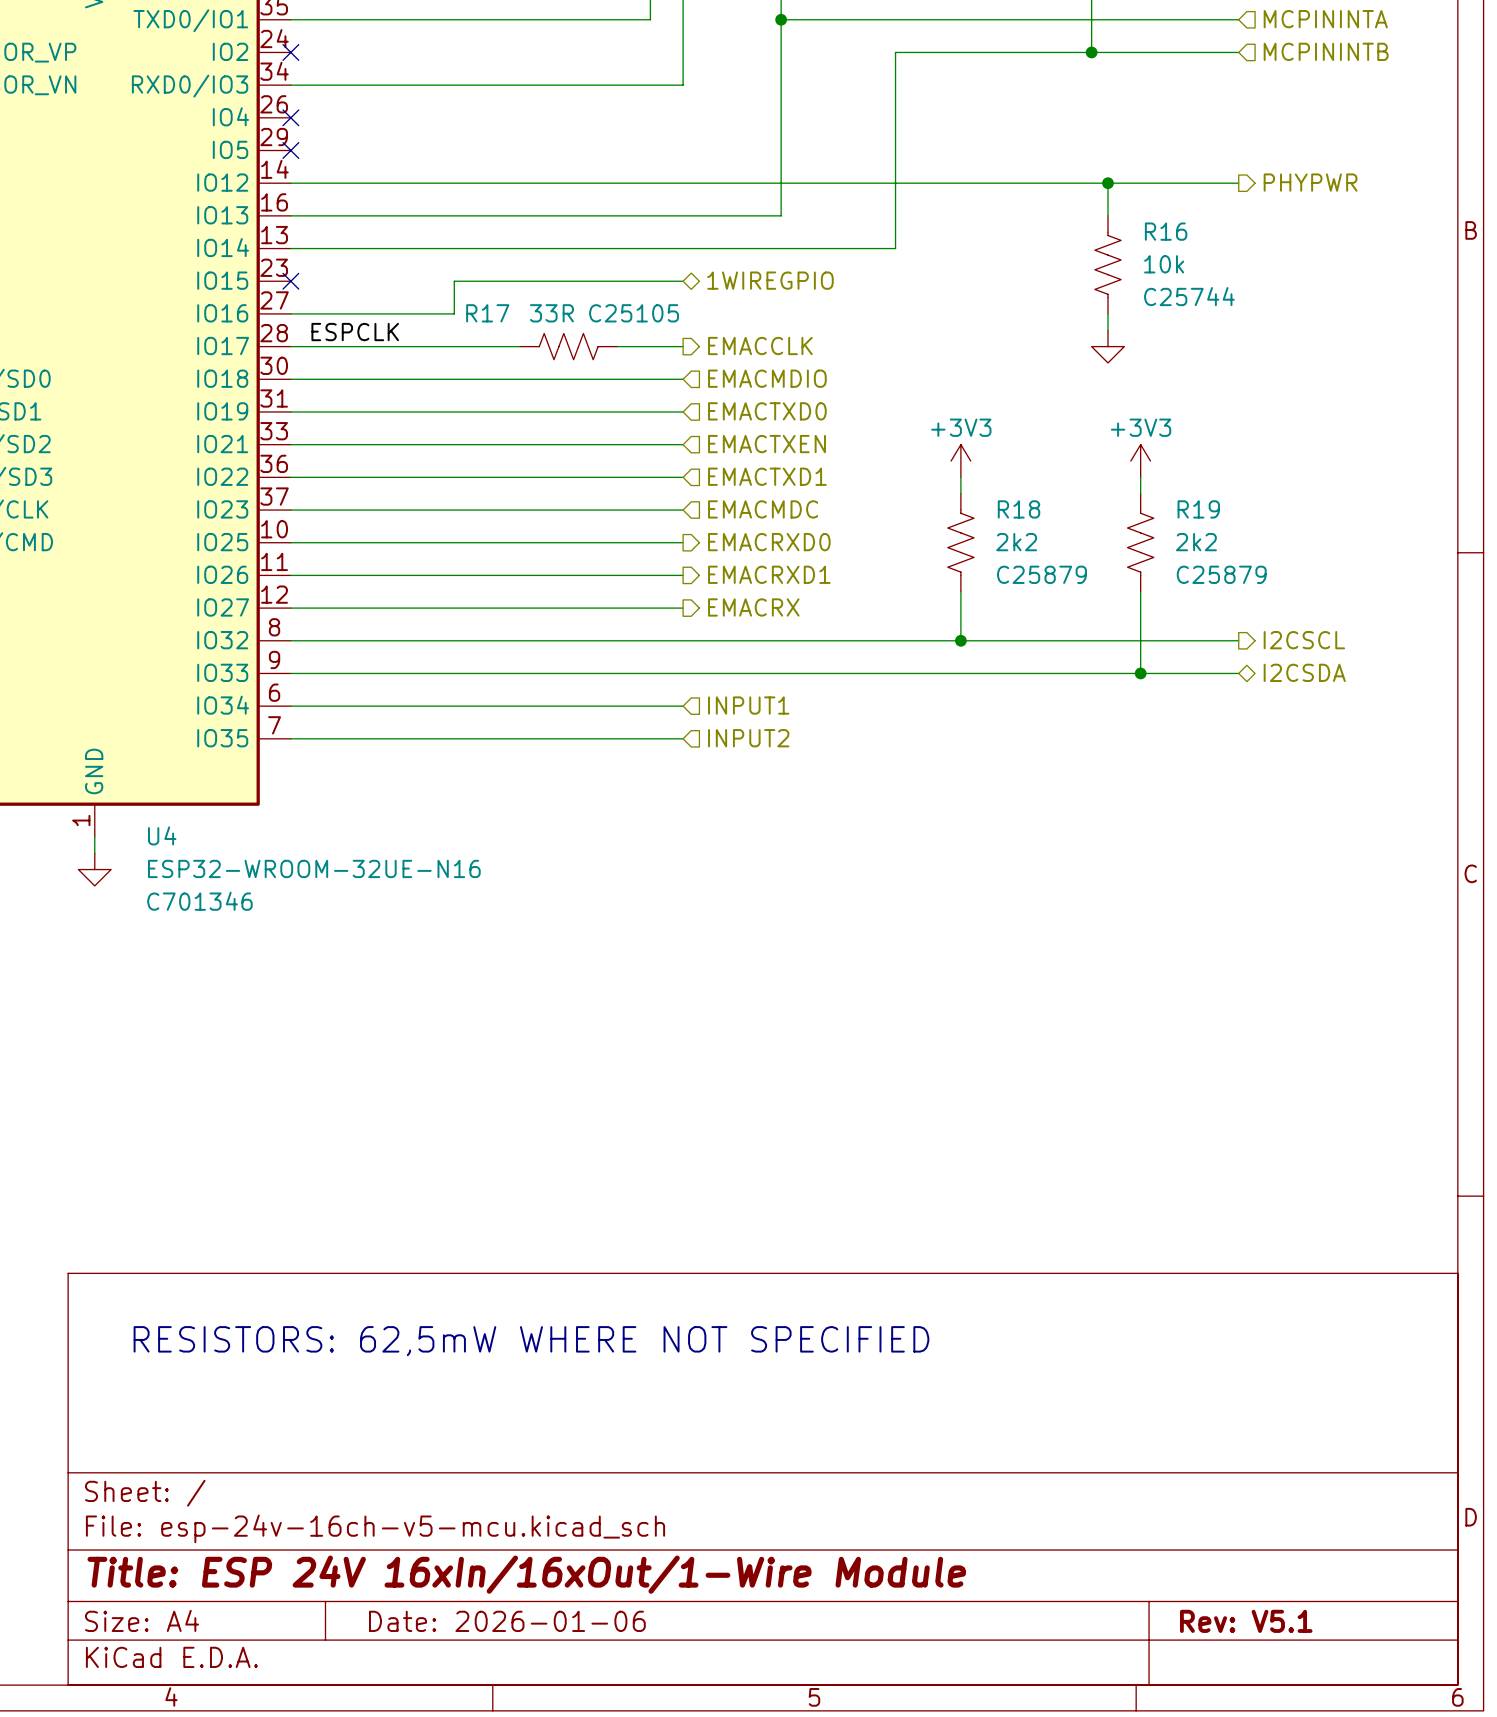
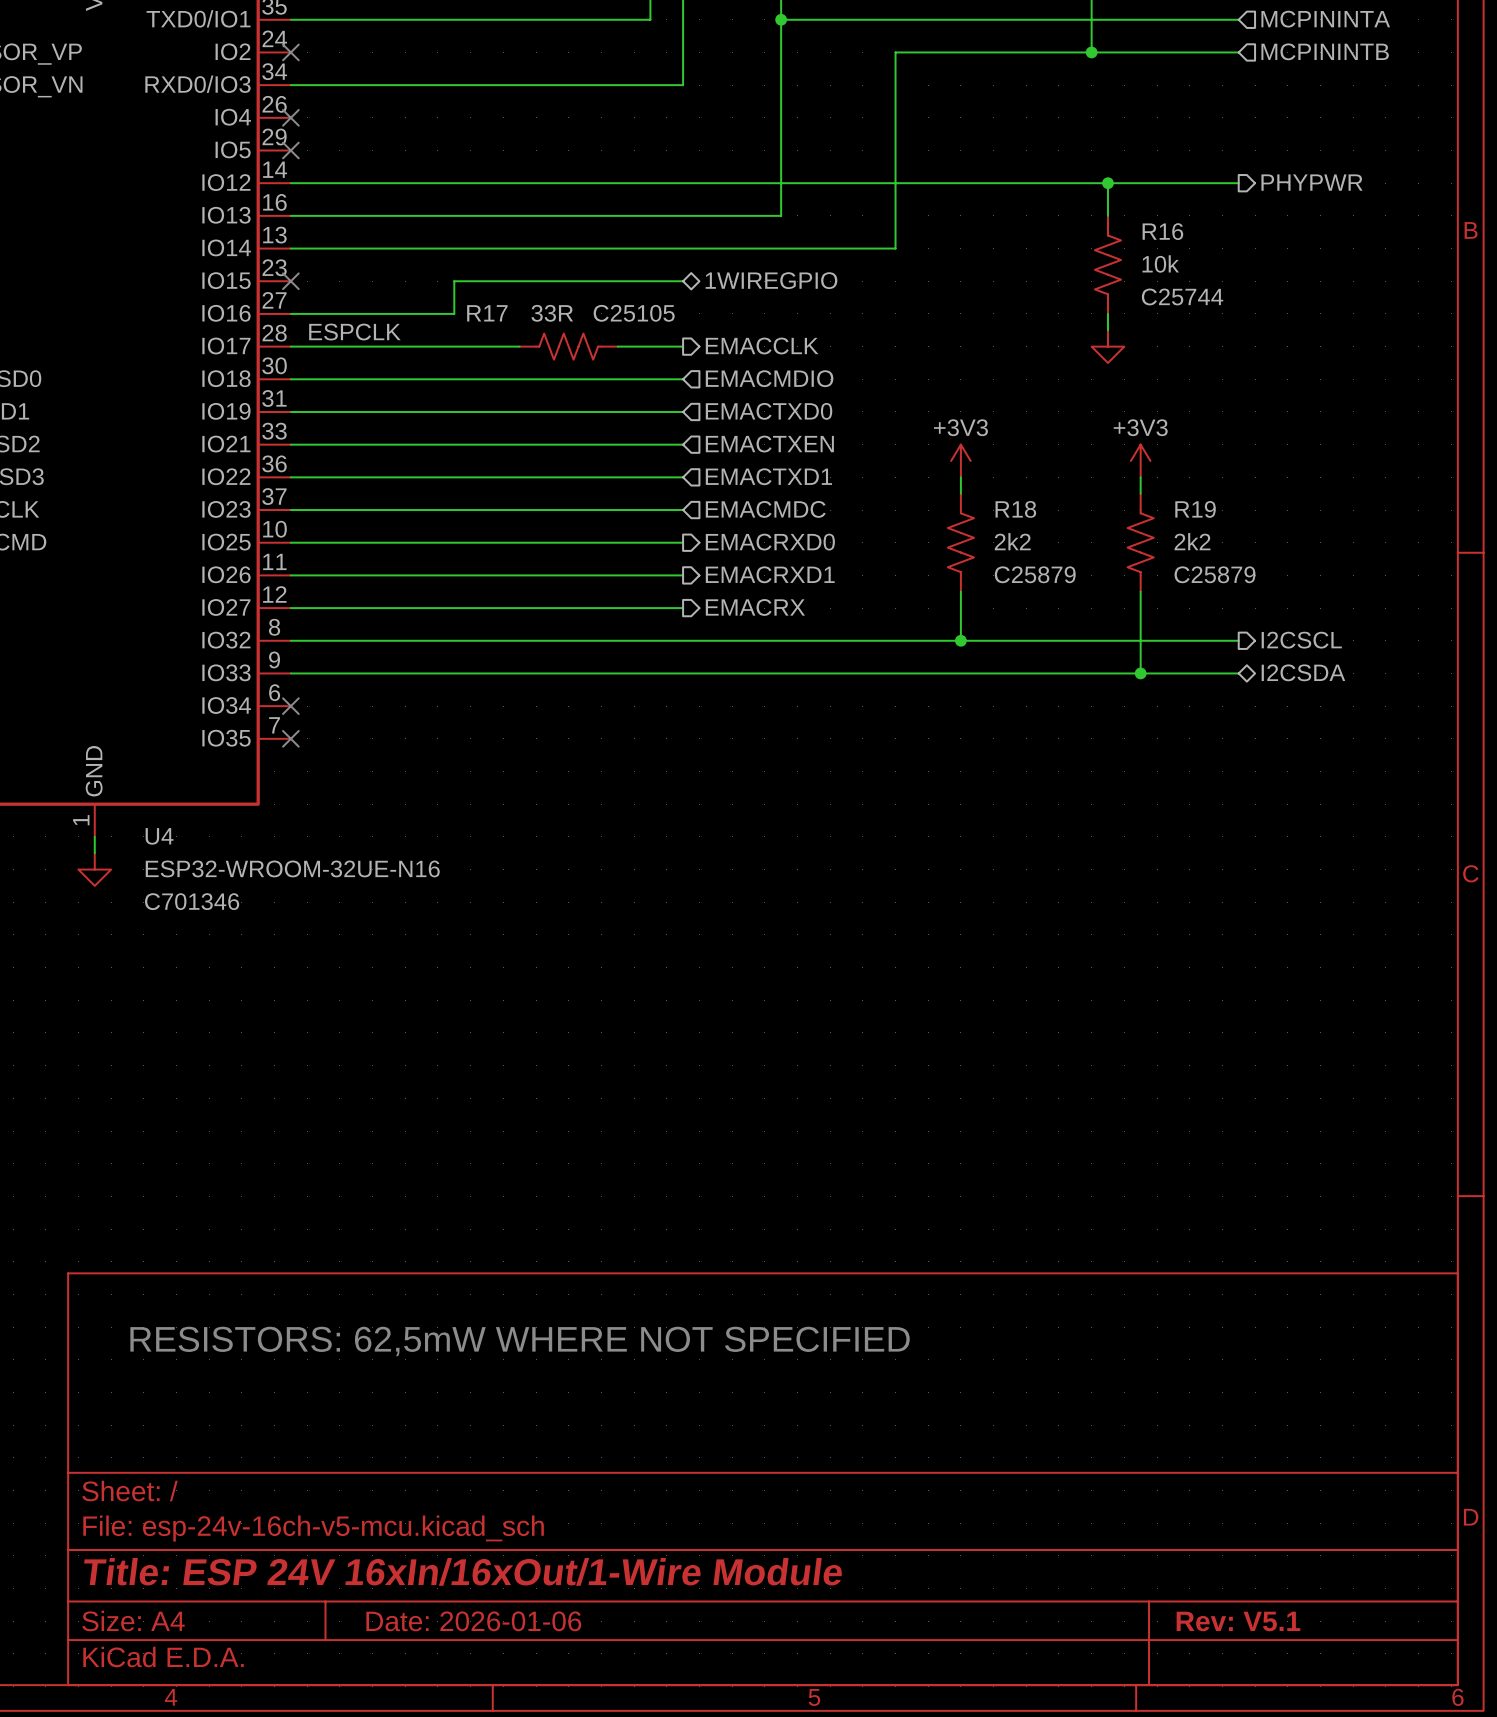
hierarchical label: INPUT1 (748, 705) -> none
wire: (290, 706) (683, 706) -> none
no-connect mark: none -> (290, 706)
wire: (290, 738) (683, 738) -> none
no-connect mark: none -> (290, 738)
hierarchical label: INPUT2 (748, 738) -> none

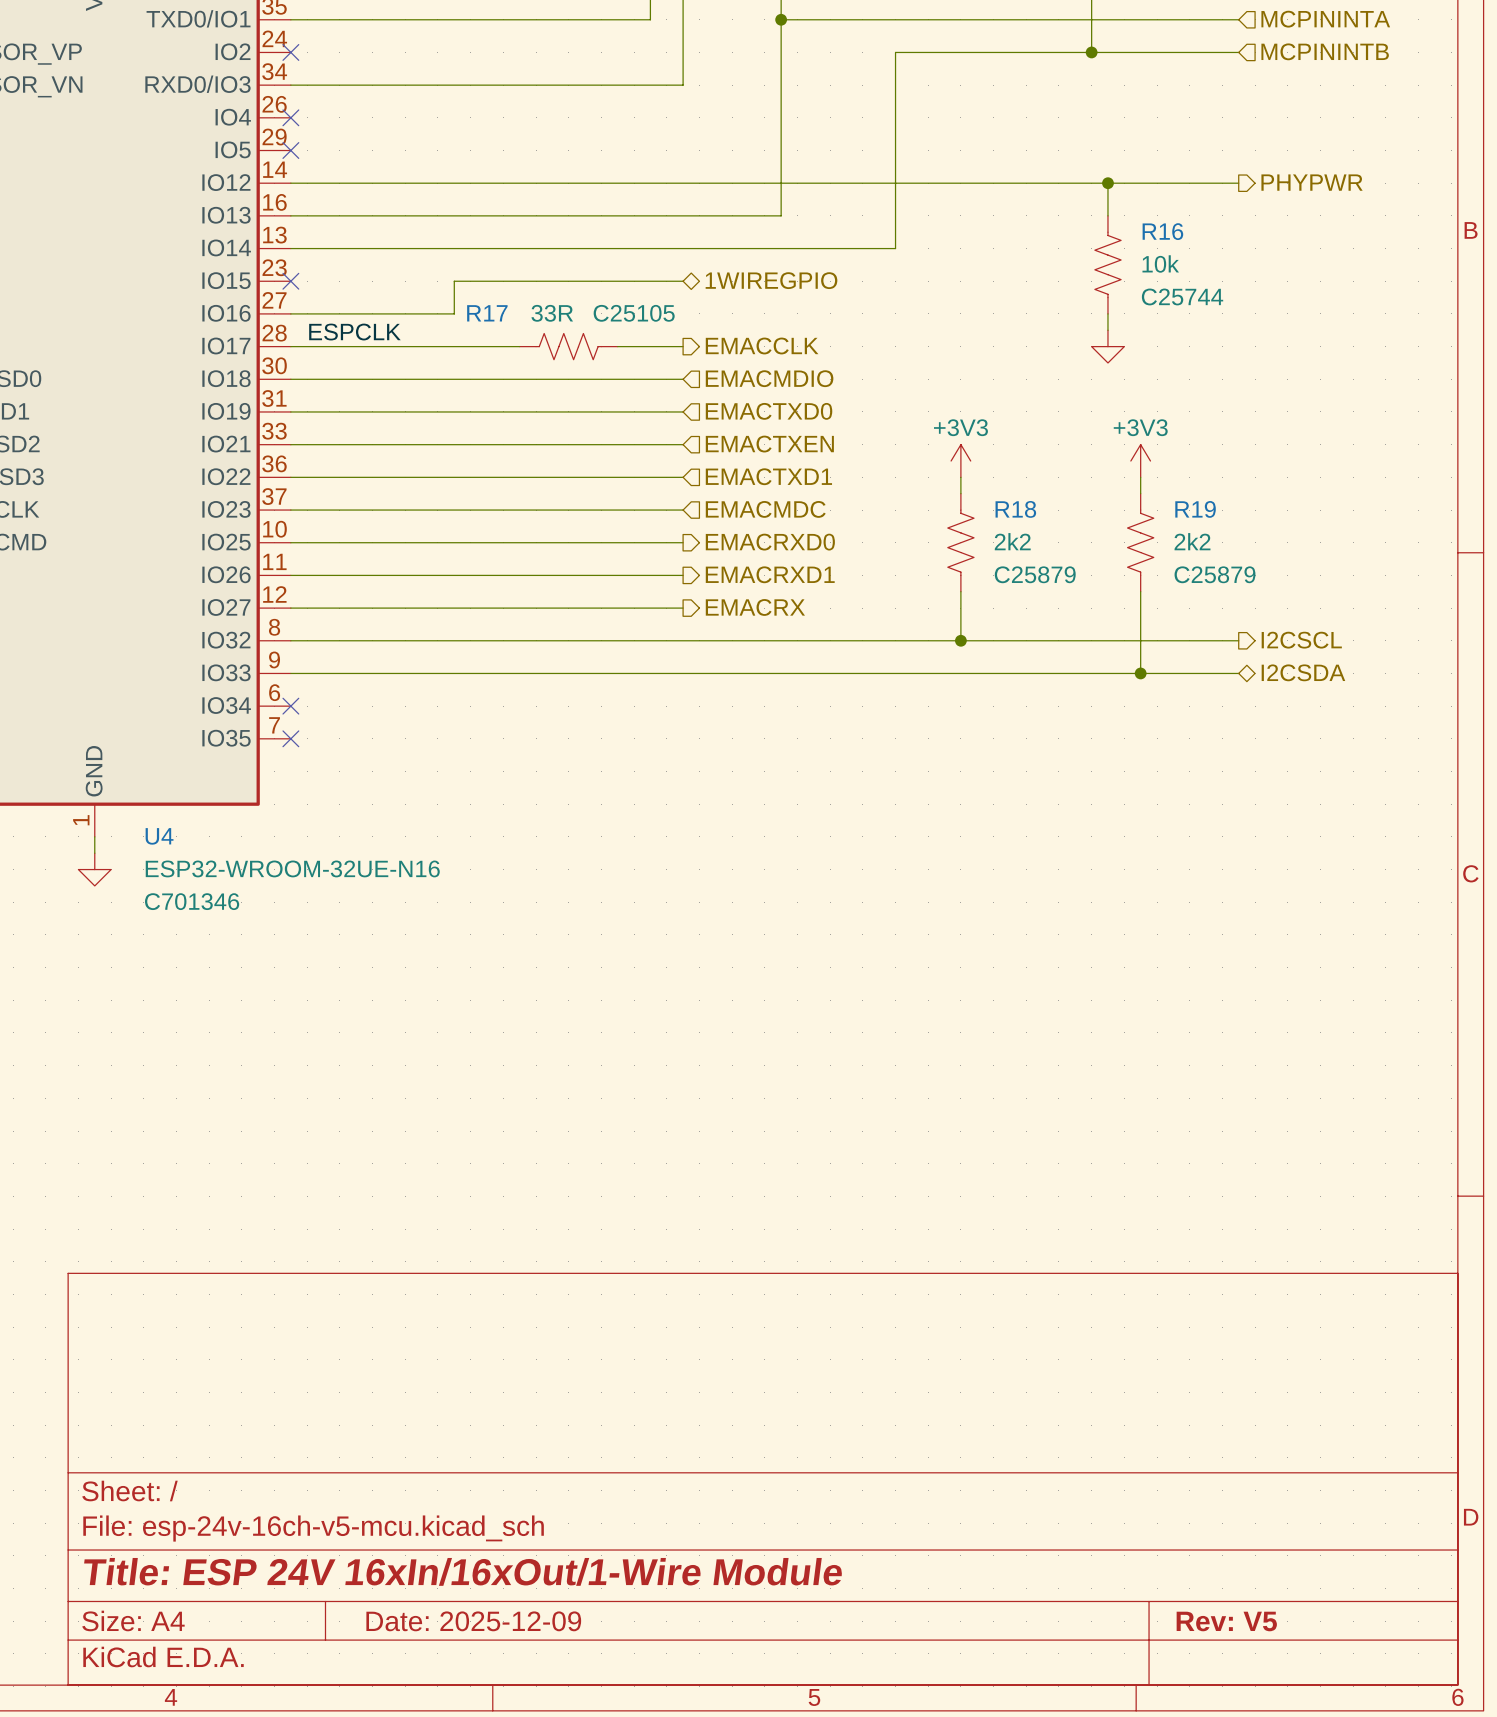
text: RESISTORS: 62,5mW WHERE NOT SPECIFIED (520, 1341) -> none
title block: Date: 2026-01-06 (473, 1621) -> Date: 2025-12-09 (473, 1621)
title block: Rev: V5.1 (1238, 1621) -> Rev: V5 (1226, 1621)

